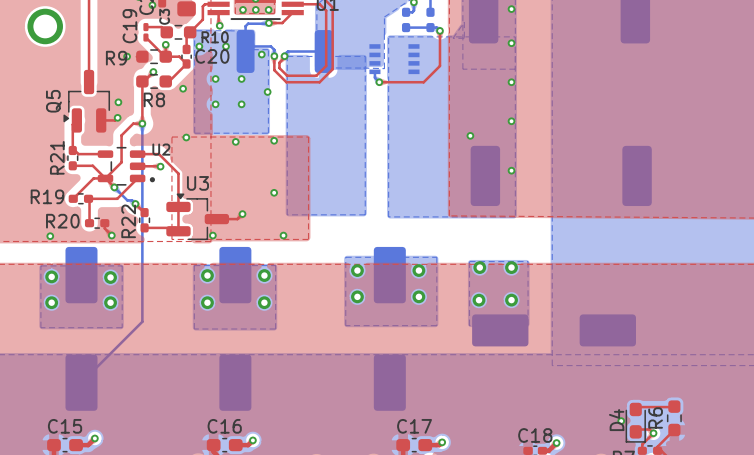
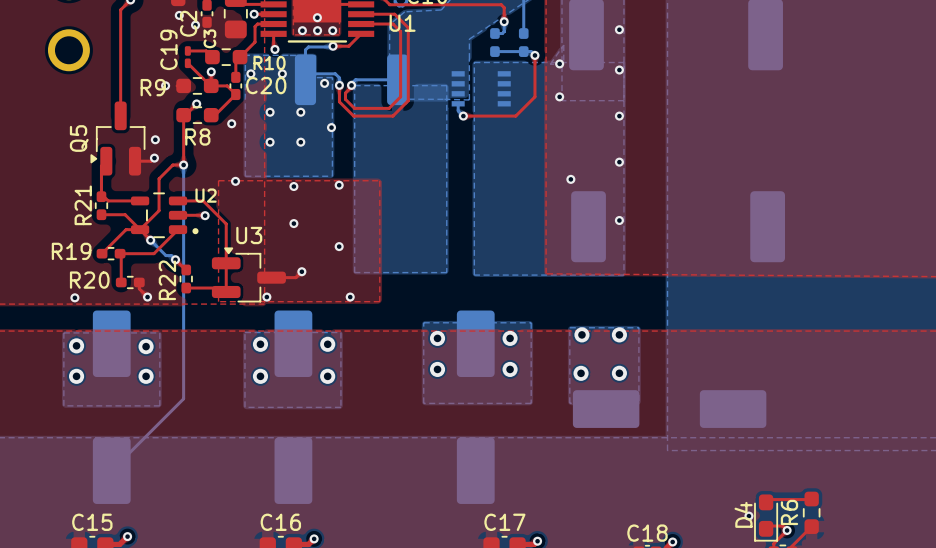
via: none -> (559, 63)
via: none -> (559, 96)
via: none -> (293, 223)

